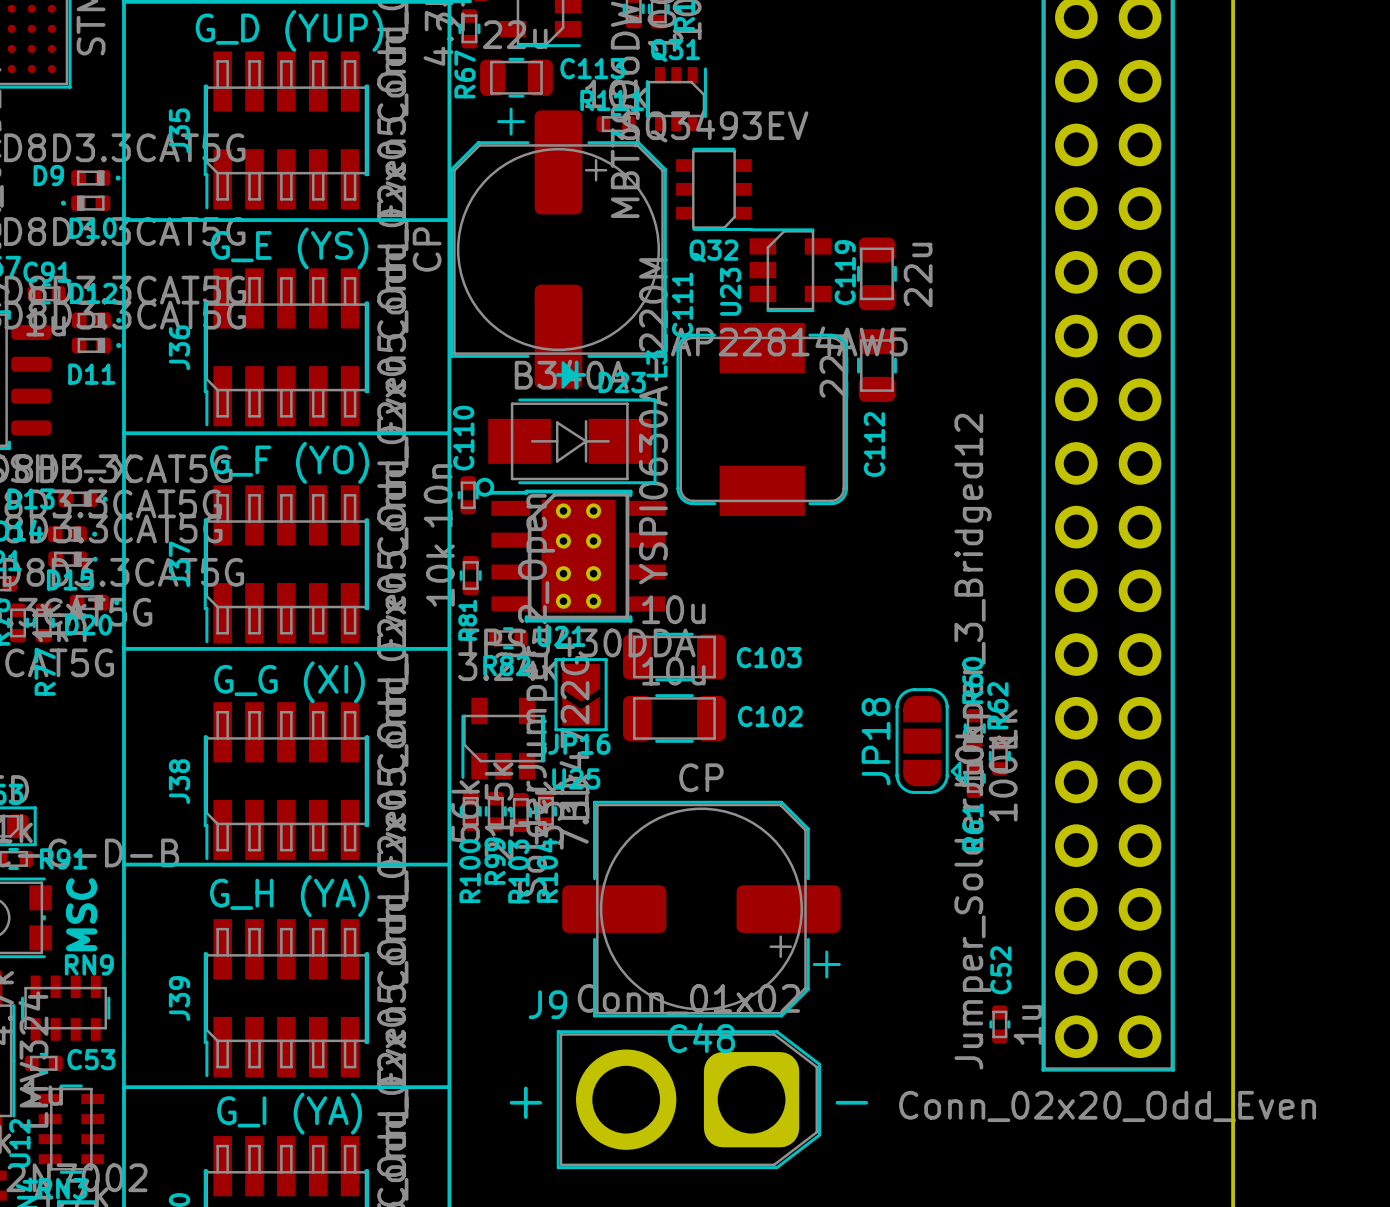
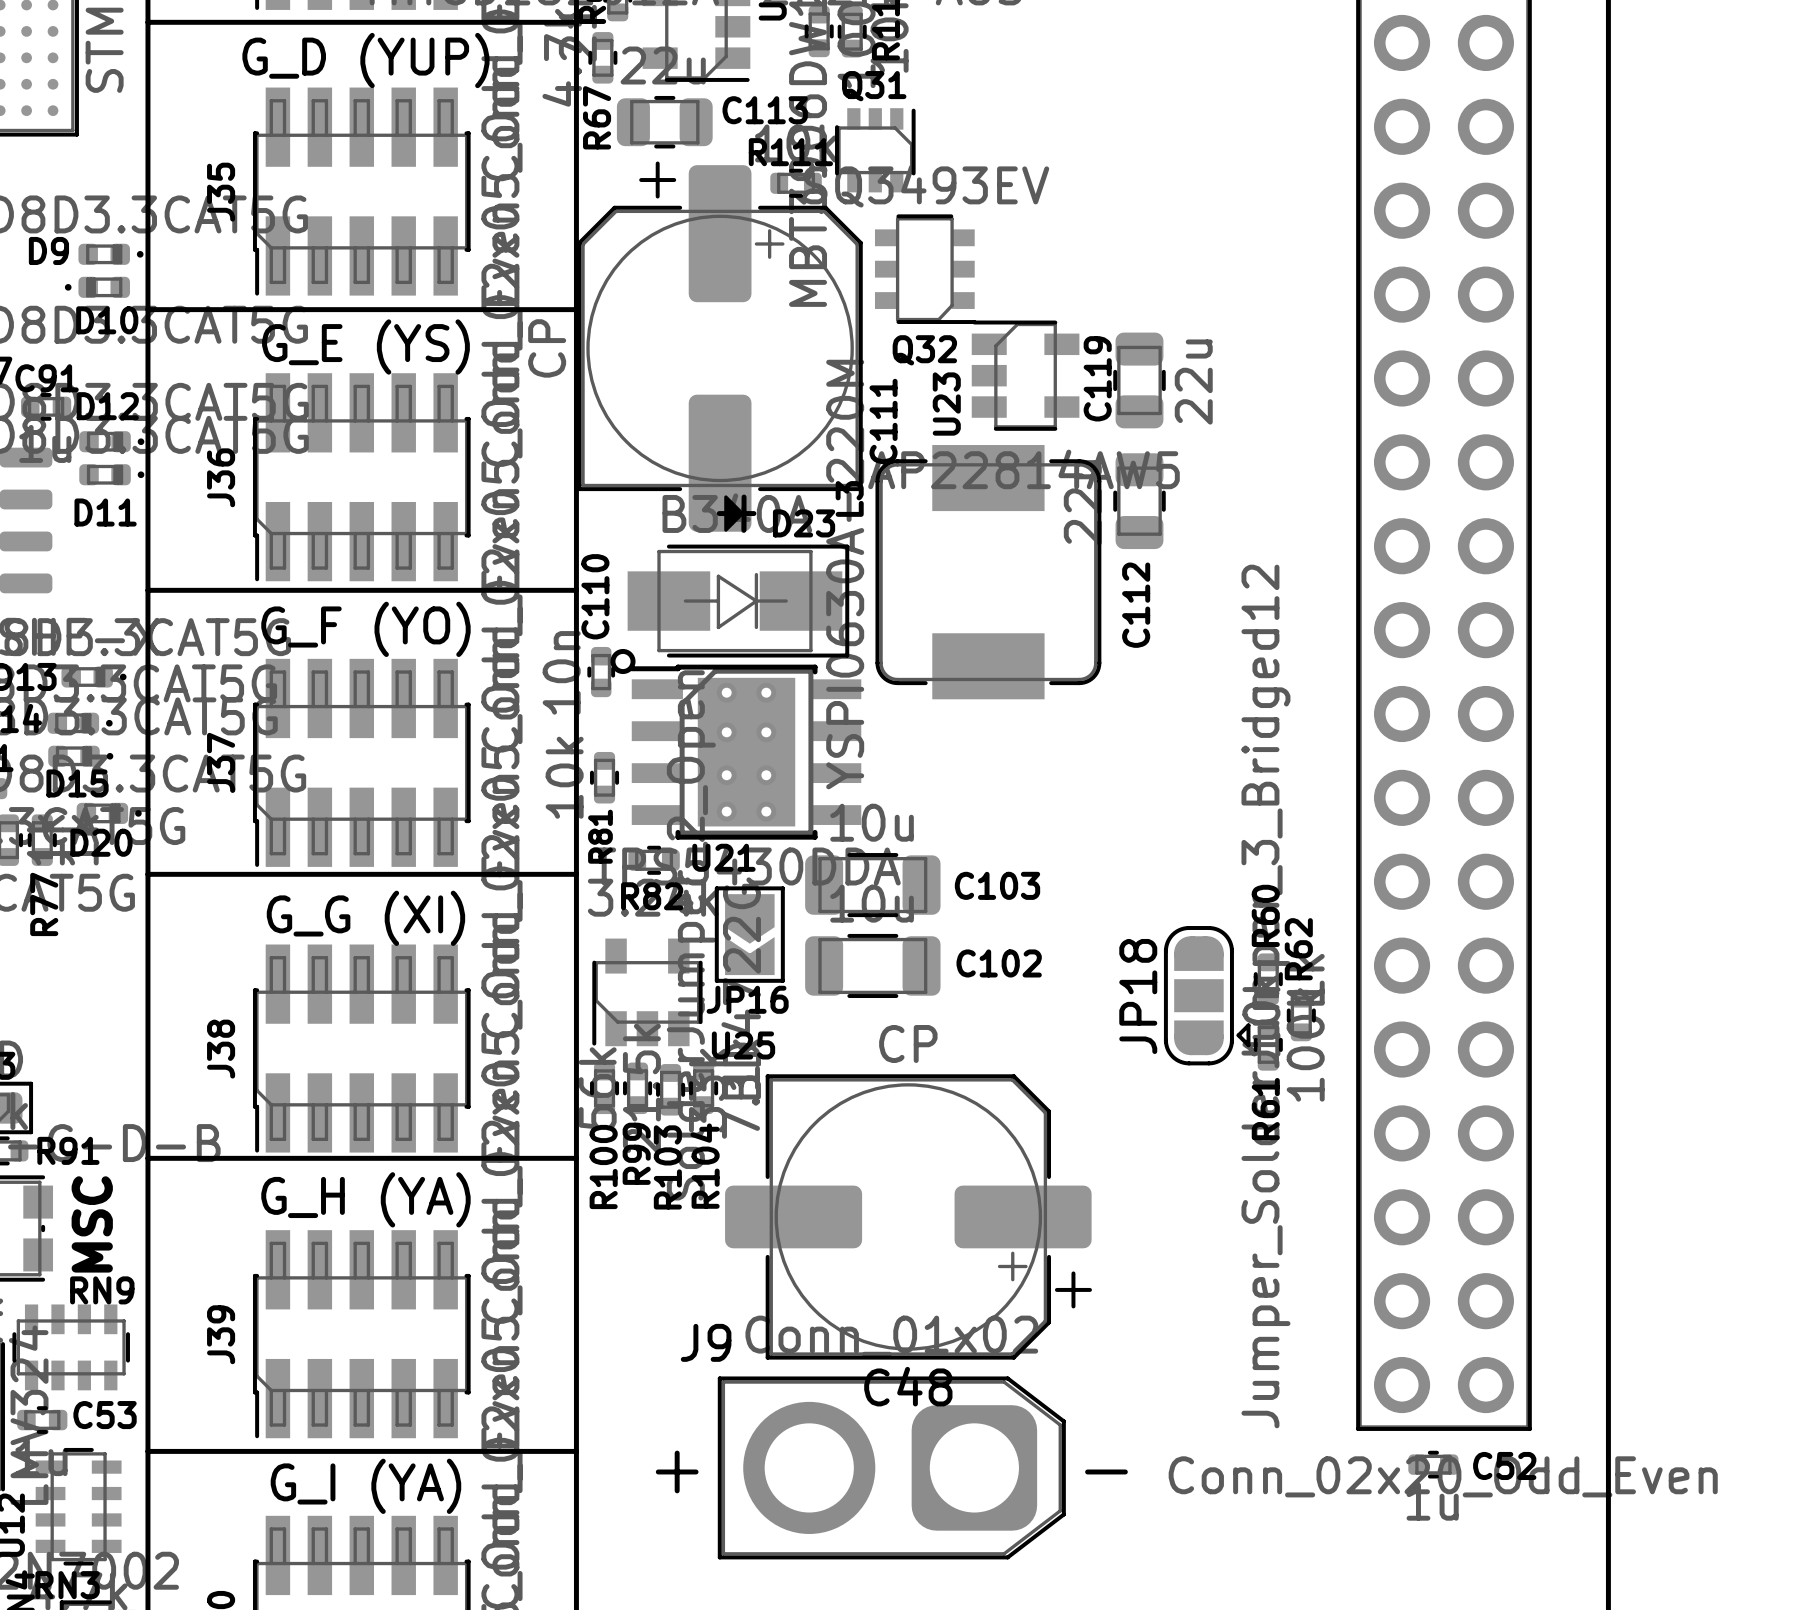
C52 rotation: 0° (999, 1024) -> 90° clockwise (1433, 1464)
C52 position: (999, 1024) -> (1433, 1464)

